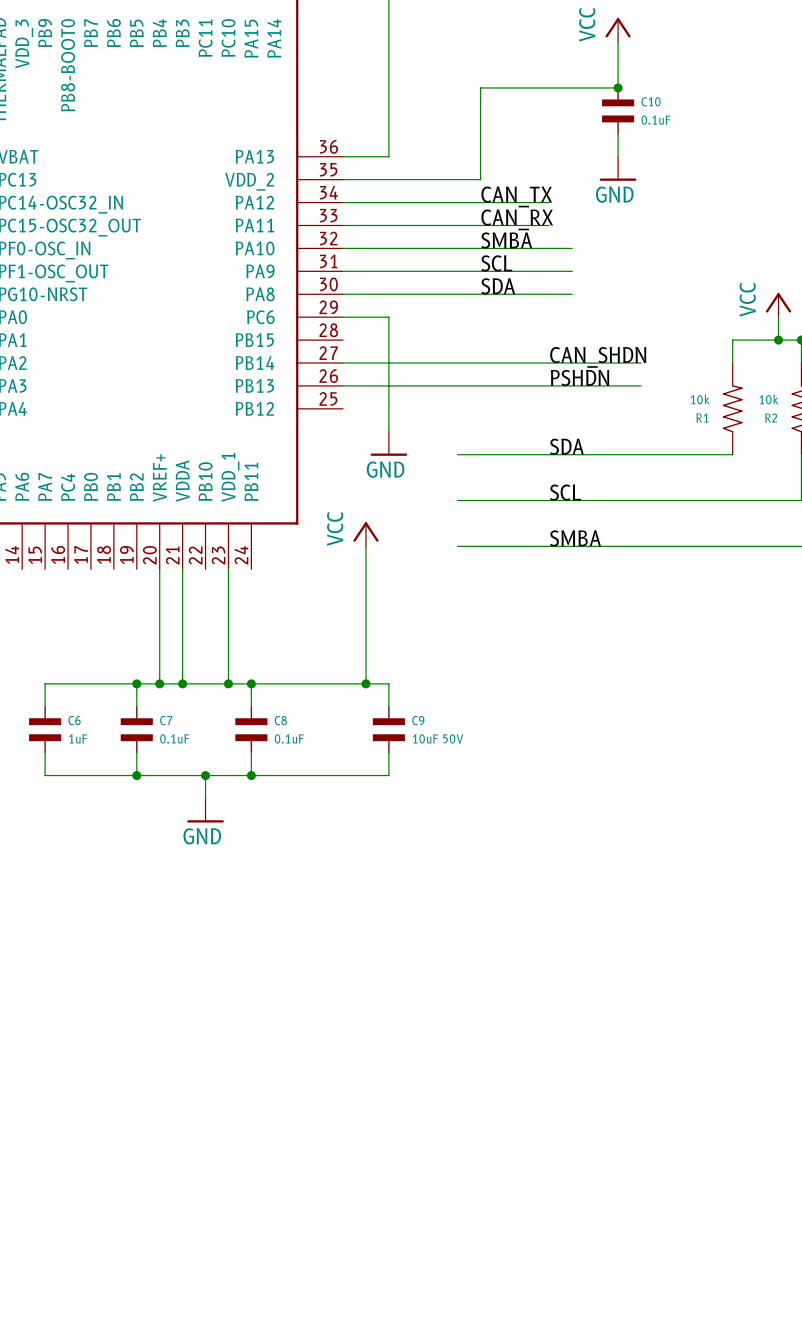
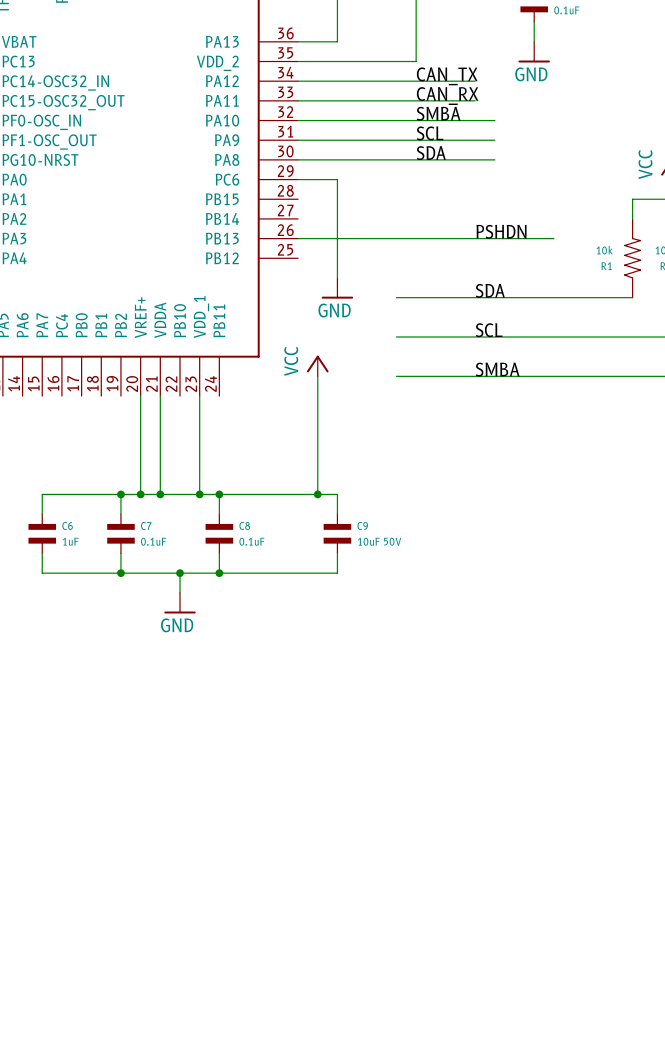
label: CAN_SHDN (598, 357) -> none
wire: (343, 363) (640, 363) -> none

